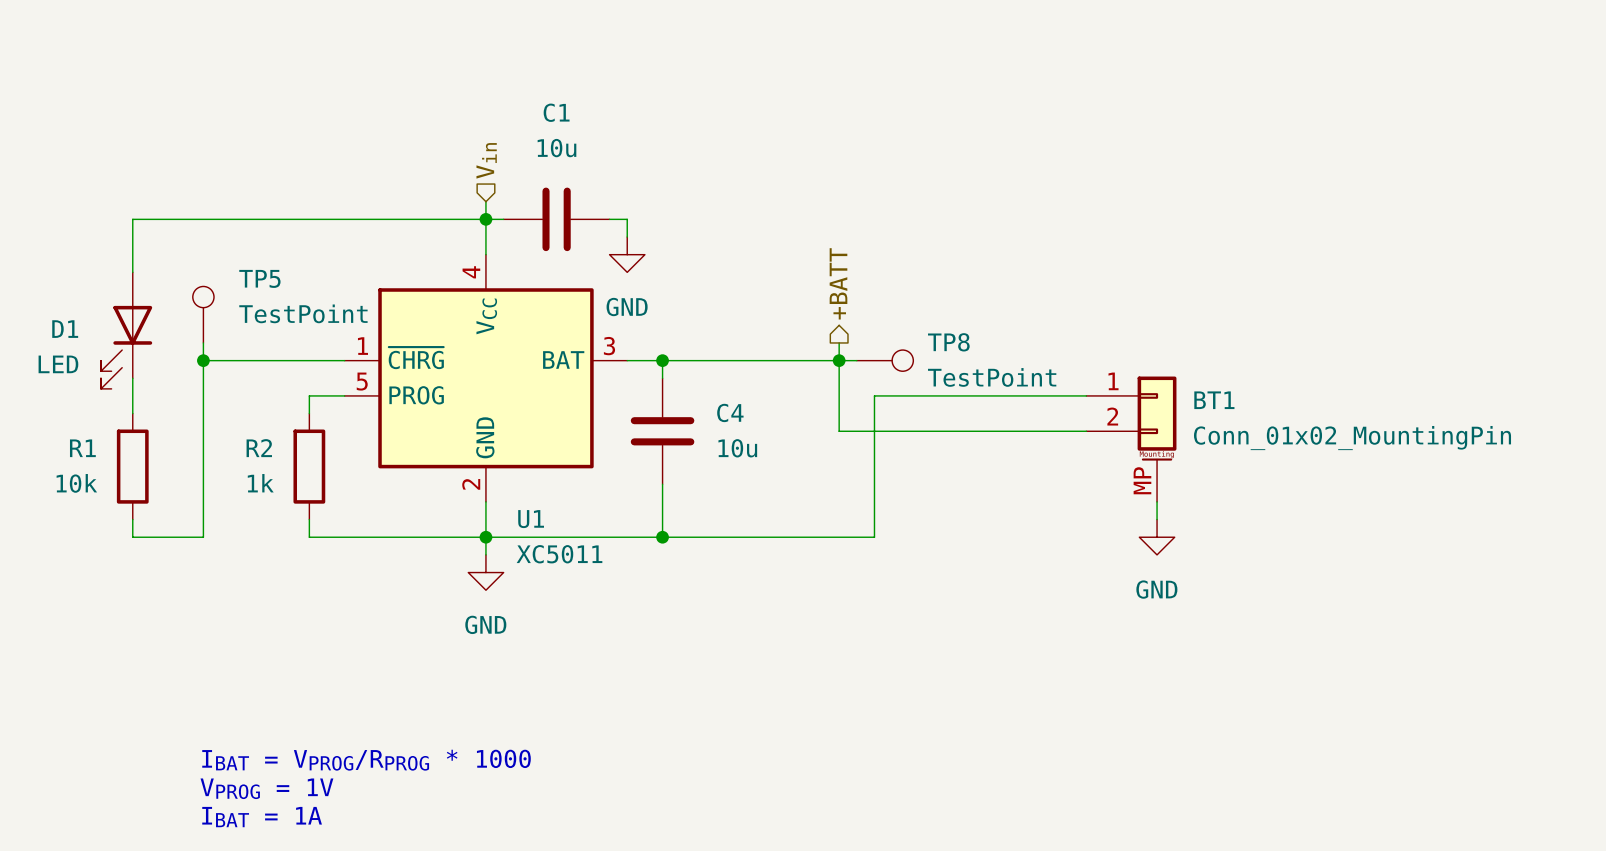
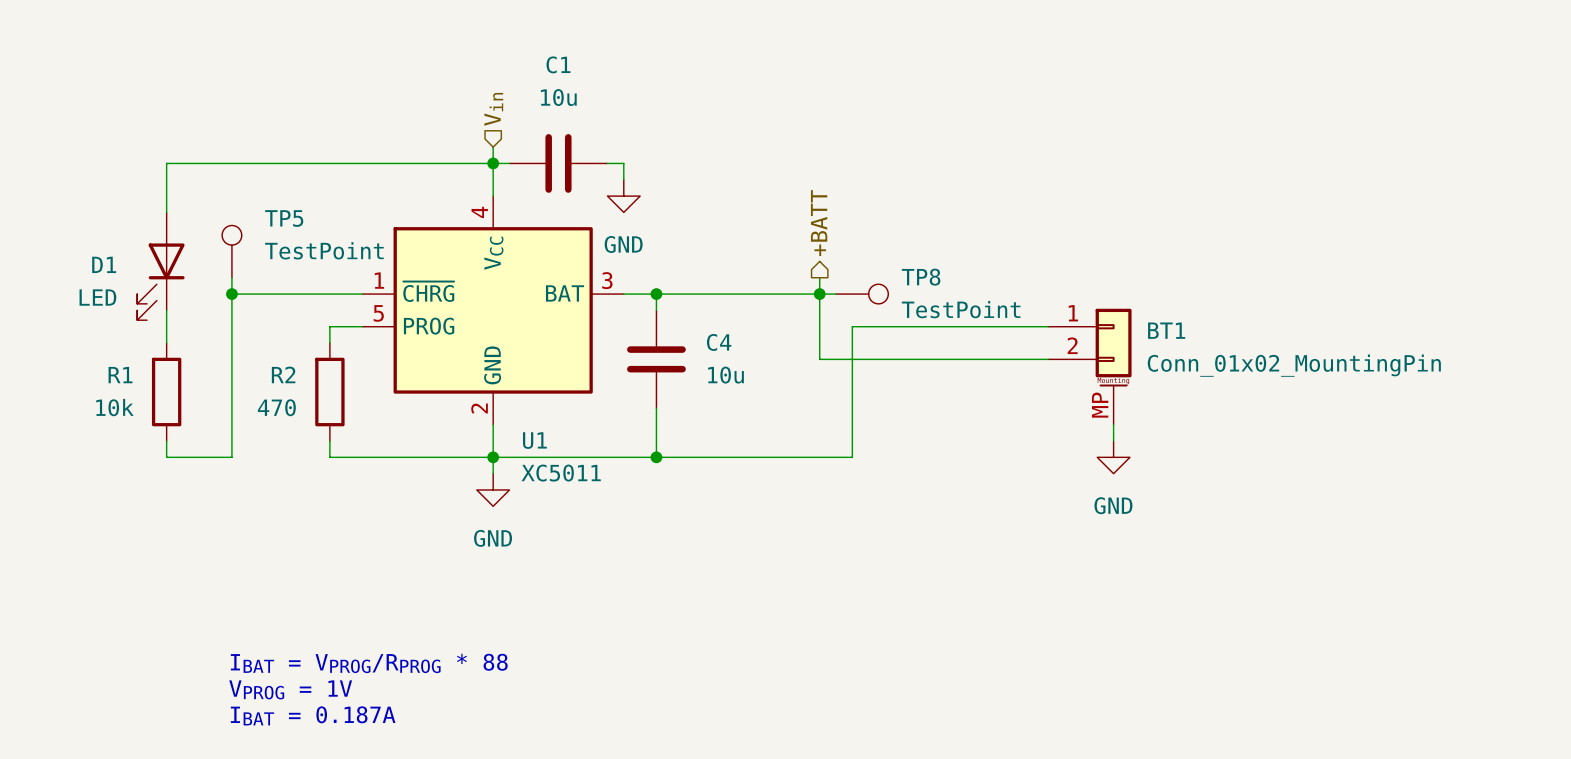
R2 value: 1k (260, 483) -> 470 (276, 407)
text: IBAT = VPROG/RPROG * 1000 (366, 760) -> IBAT = VPROG/RPROG * 88 (369, 663)
text: IBAT = 1A (262, 817) -> IBAT = 0.187A (313, 715)

